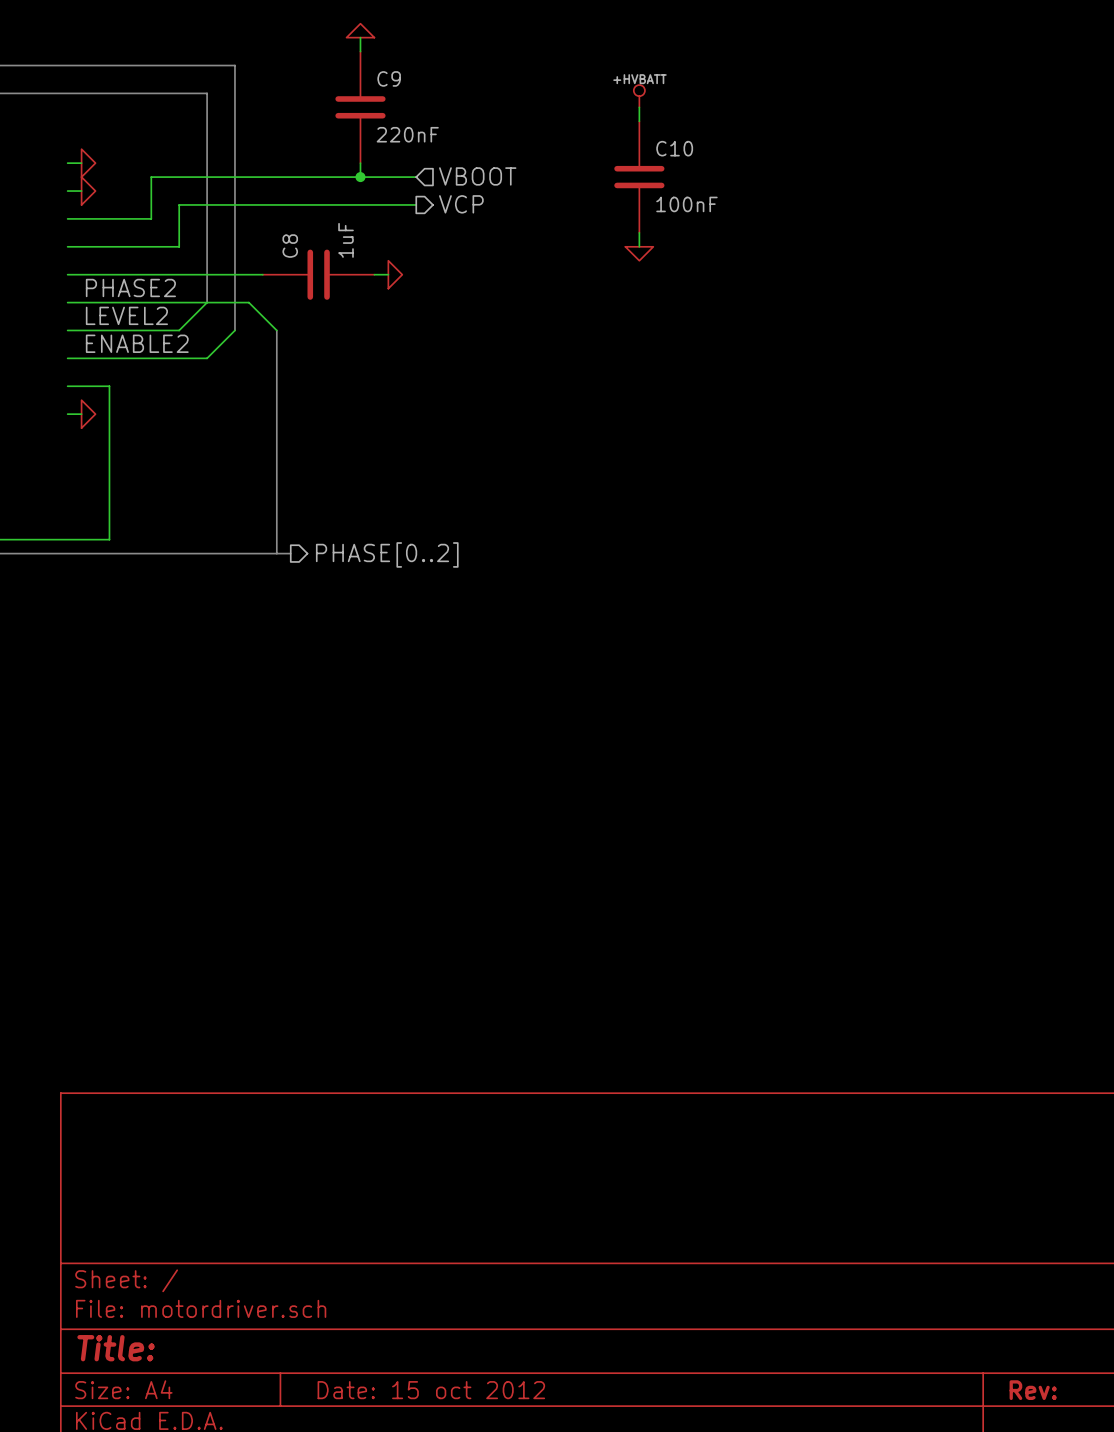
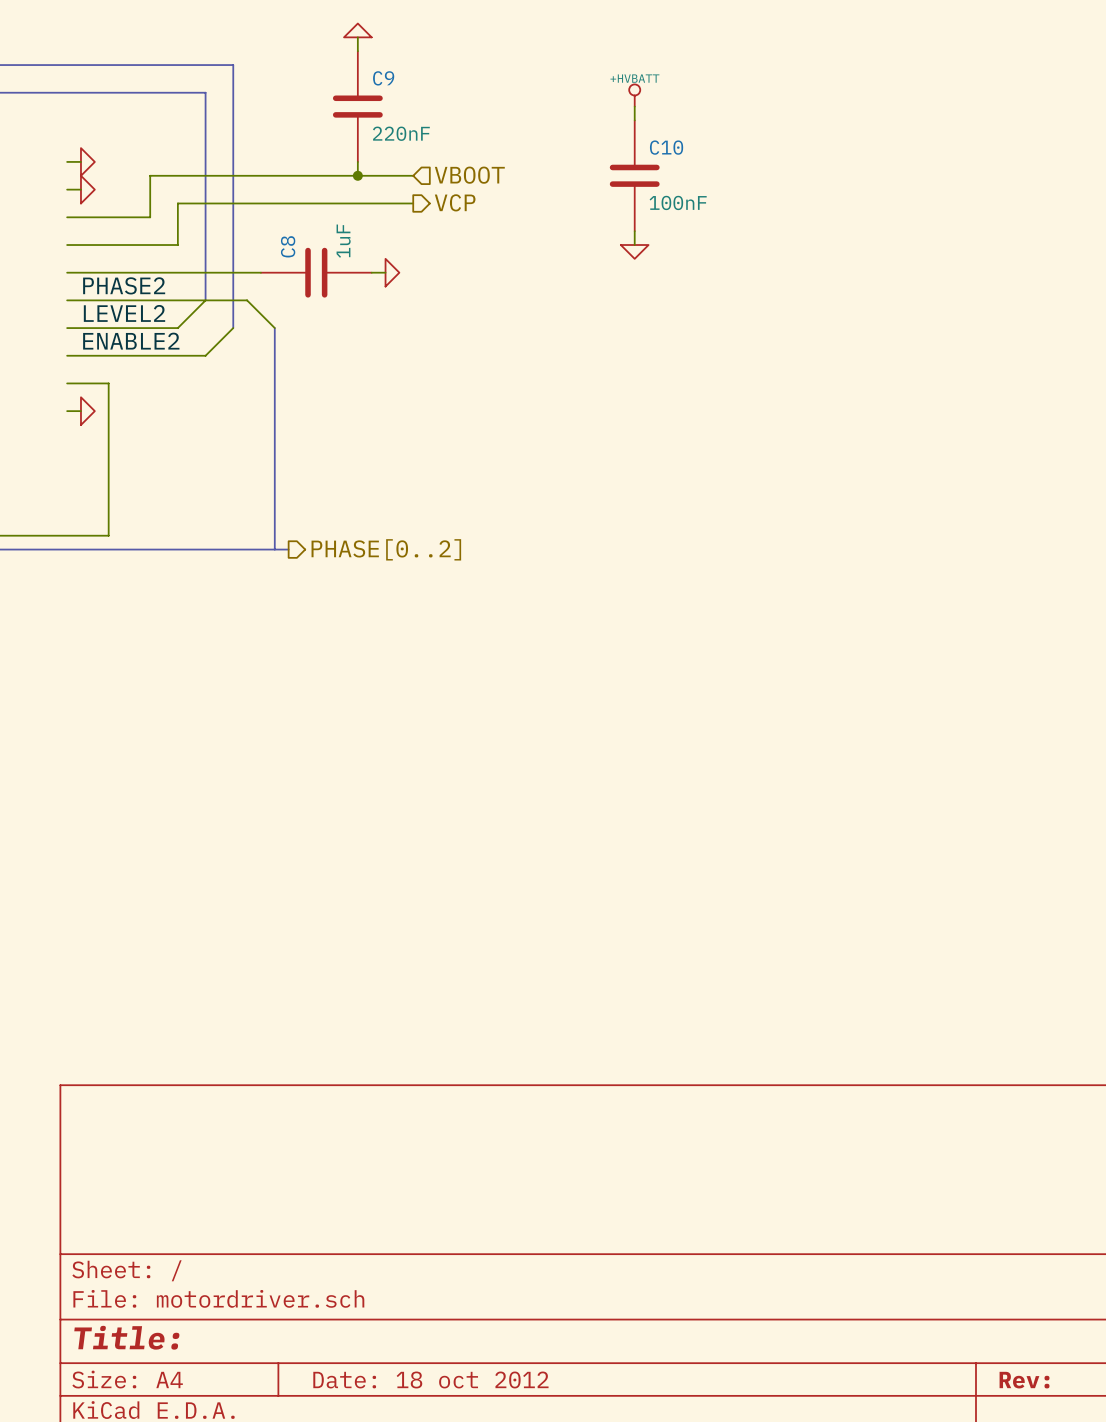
title block: Date: 15 oct 2012 (431, 1390) -> Date: 18 oct 2012 (430, 1379)

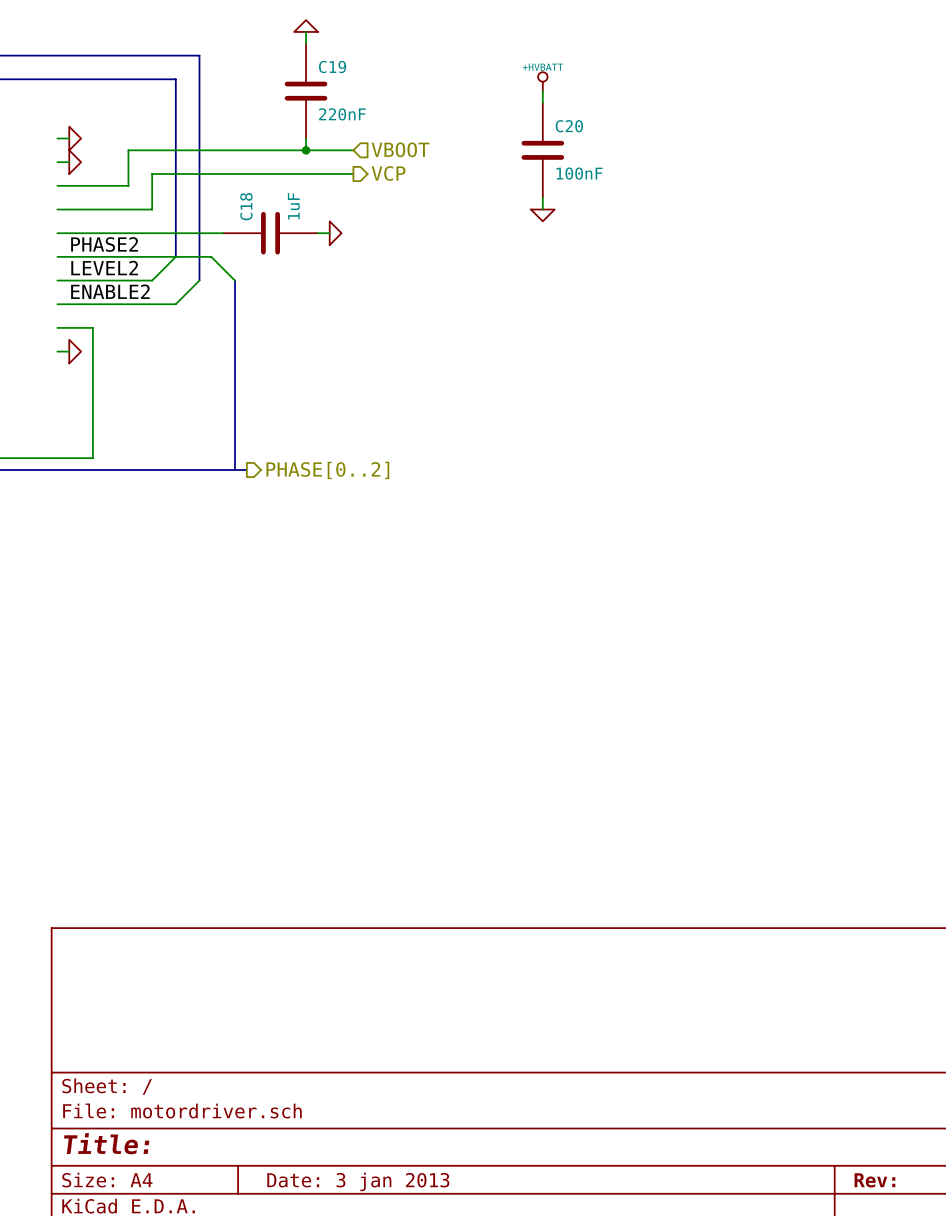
C9 name: C9 (383, 78) -> C19 (332, 67)
C10 name: C10 (666, 147) -> C20 (569, 126)
C8 name: C8 (288, 246) -> C18 (246, 206)
title block: Date: 18 oct 2012 (430, 1379) -> Date: 3 jan 2013 (358, 1181)

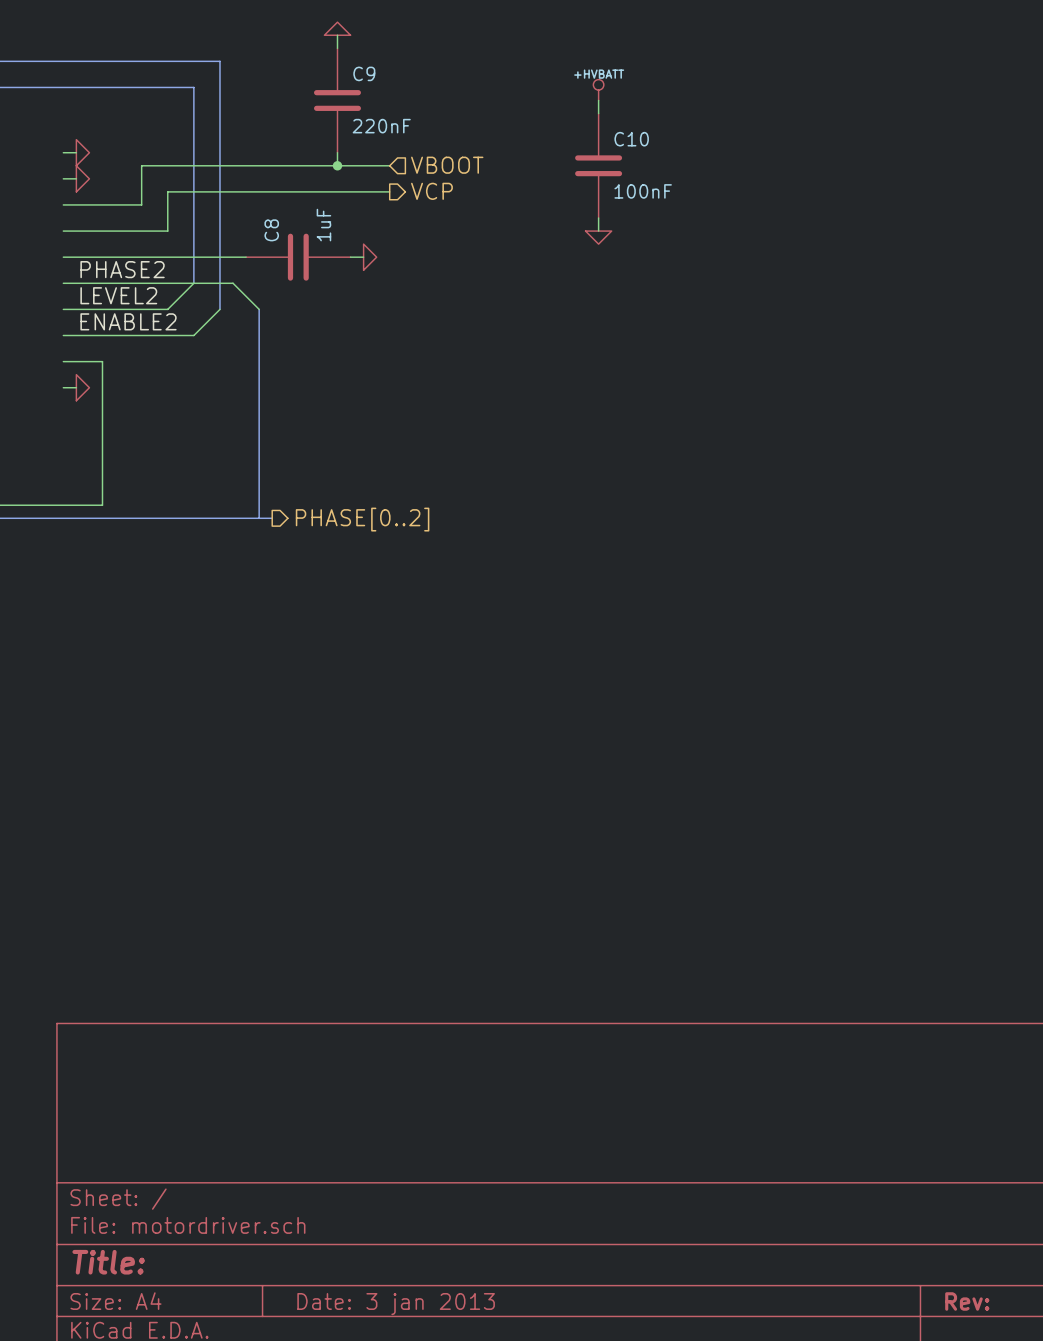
C19 name: C19 (332, 67) -> C9 (364, 73)
C20 name: C20 (569, 126) -> C10 (631, 139)
C18 name: C18 (246, 206) -> C8 (271, 230)

